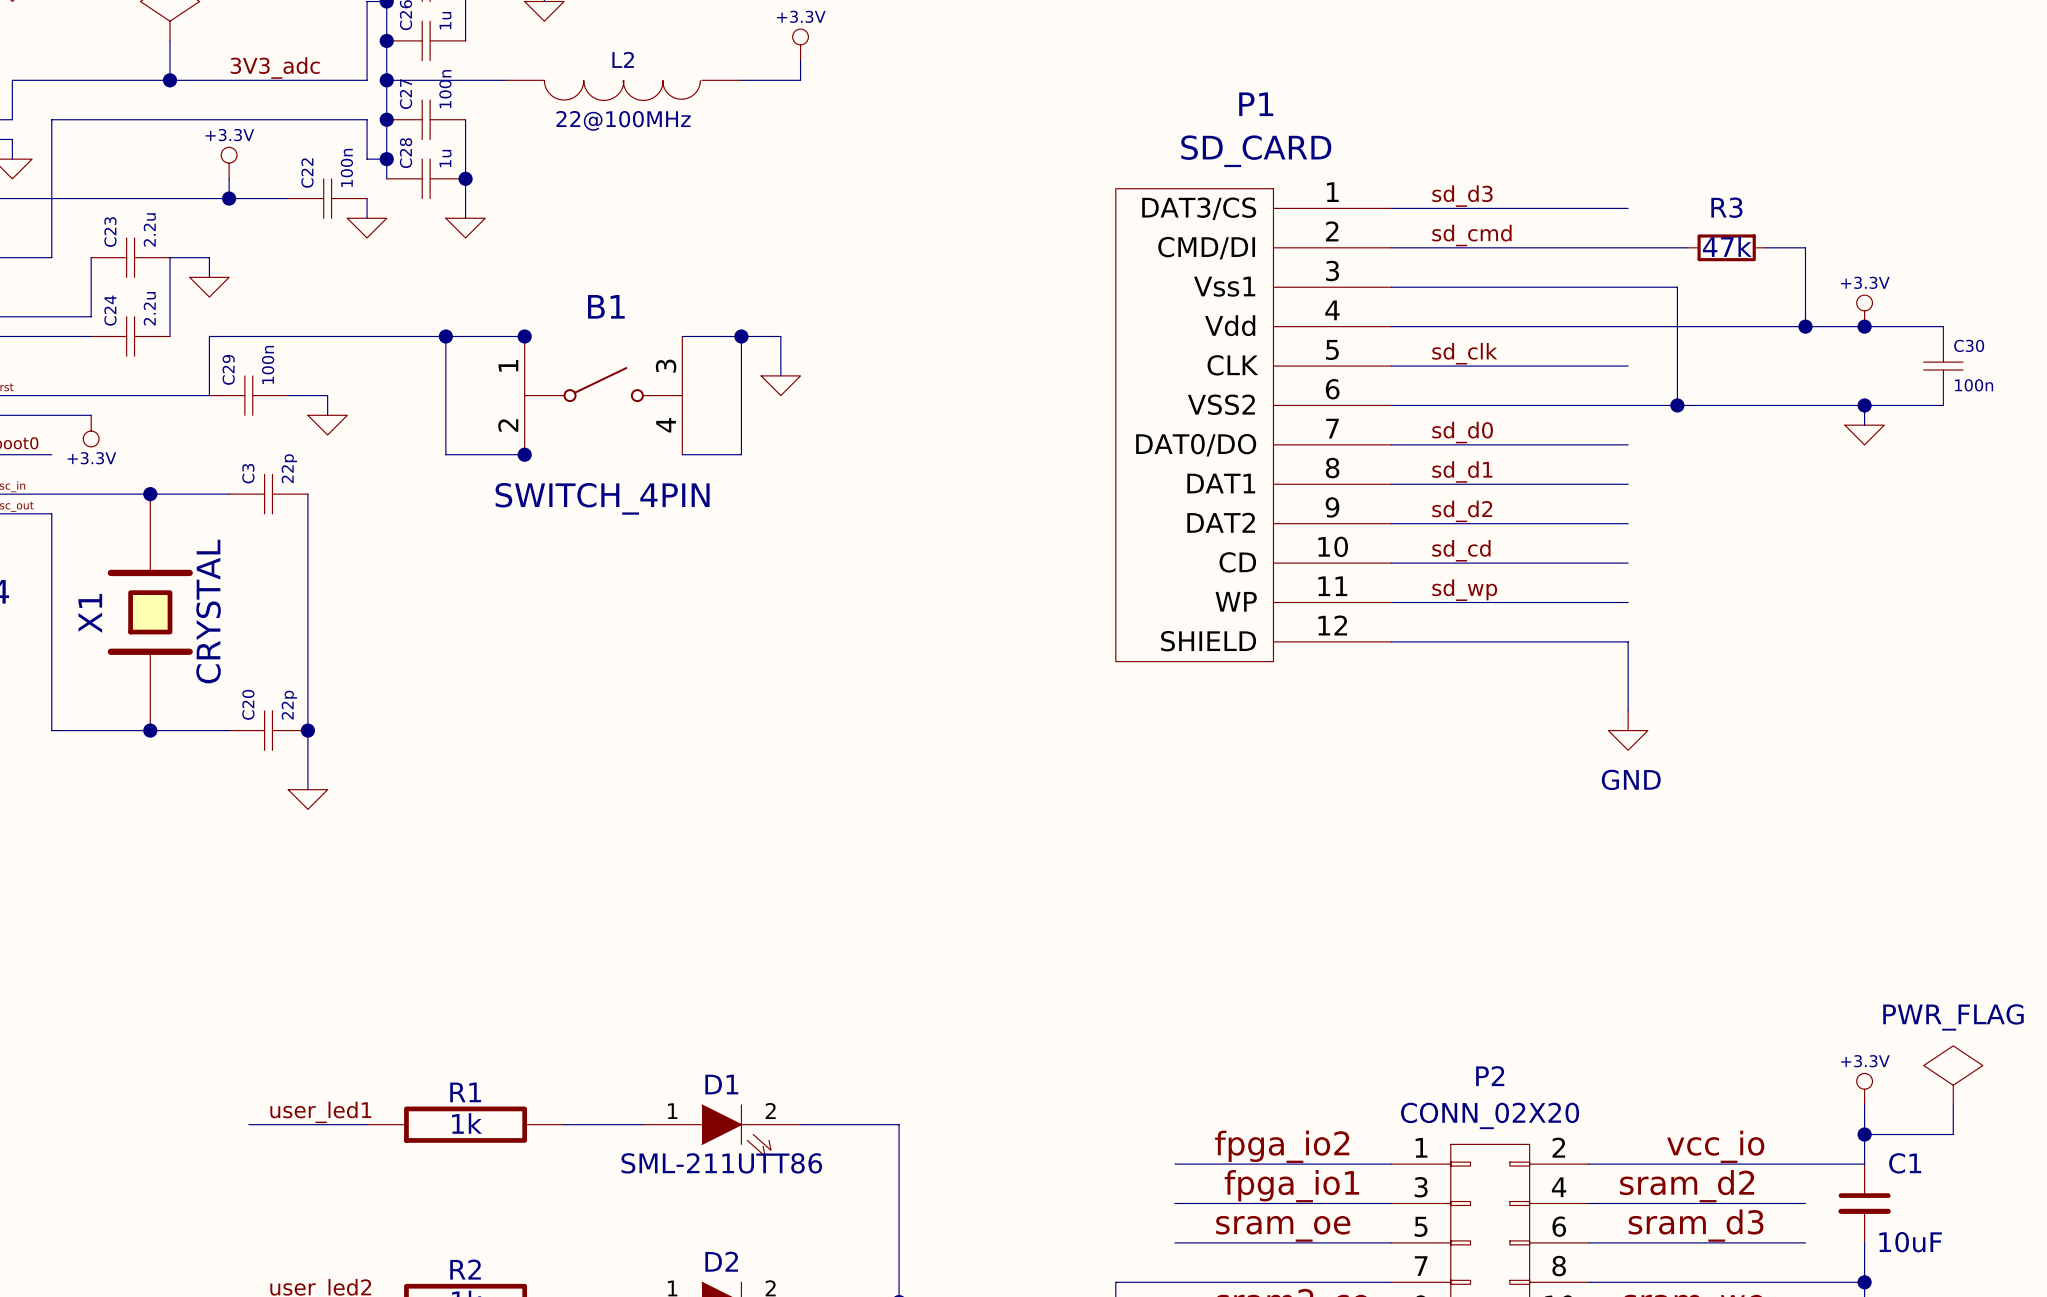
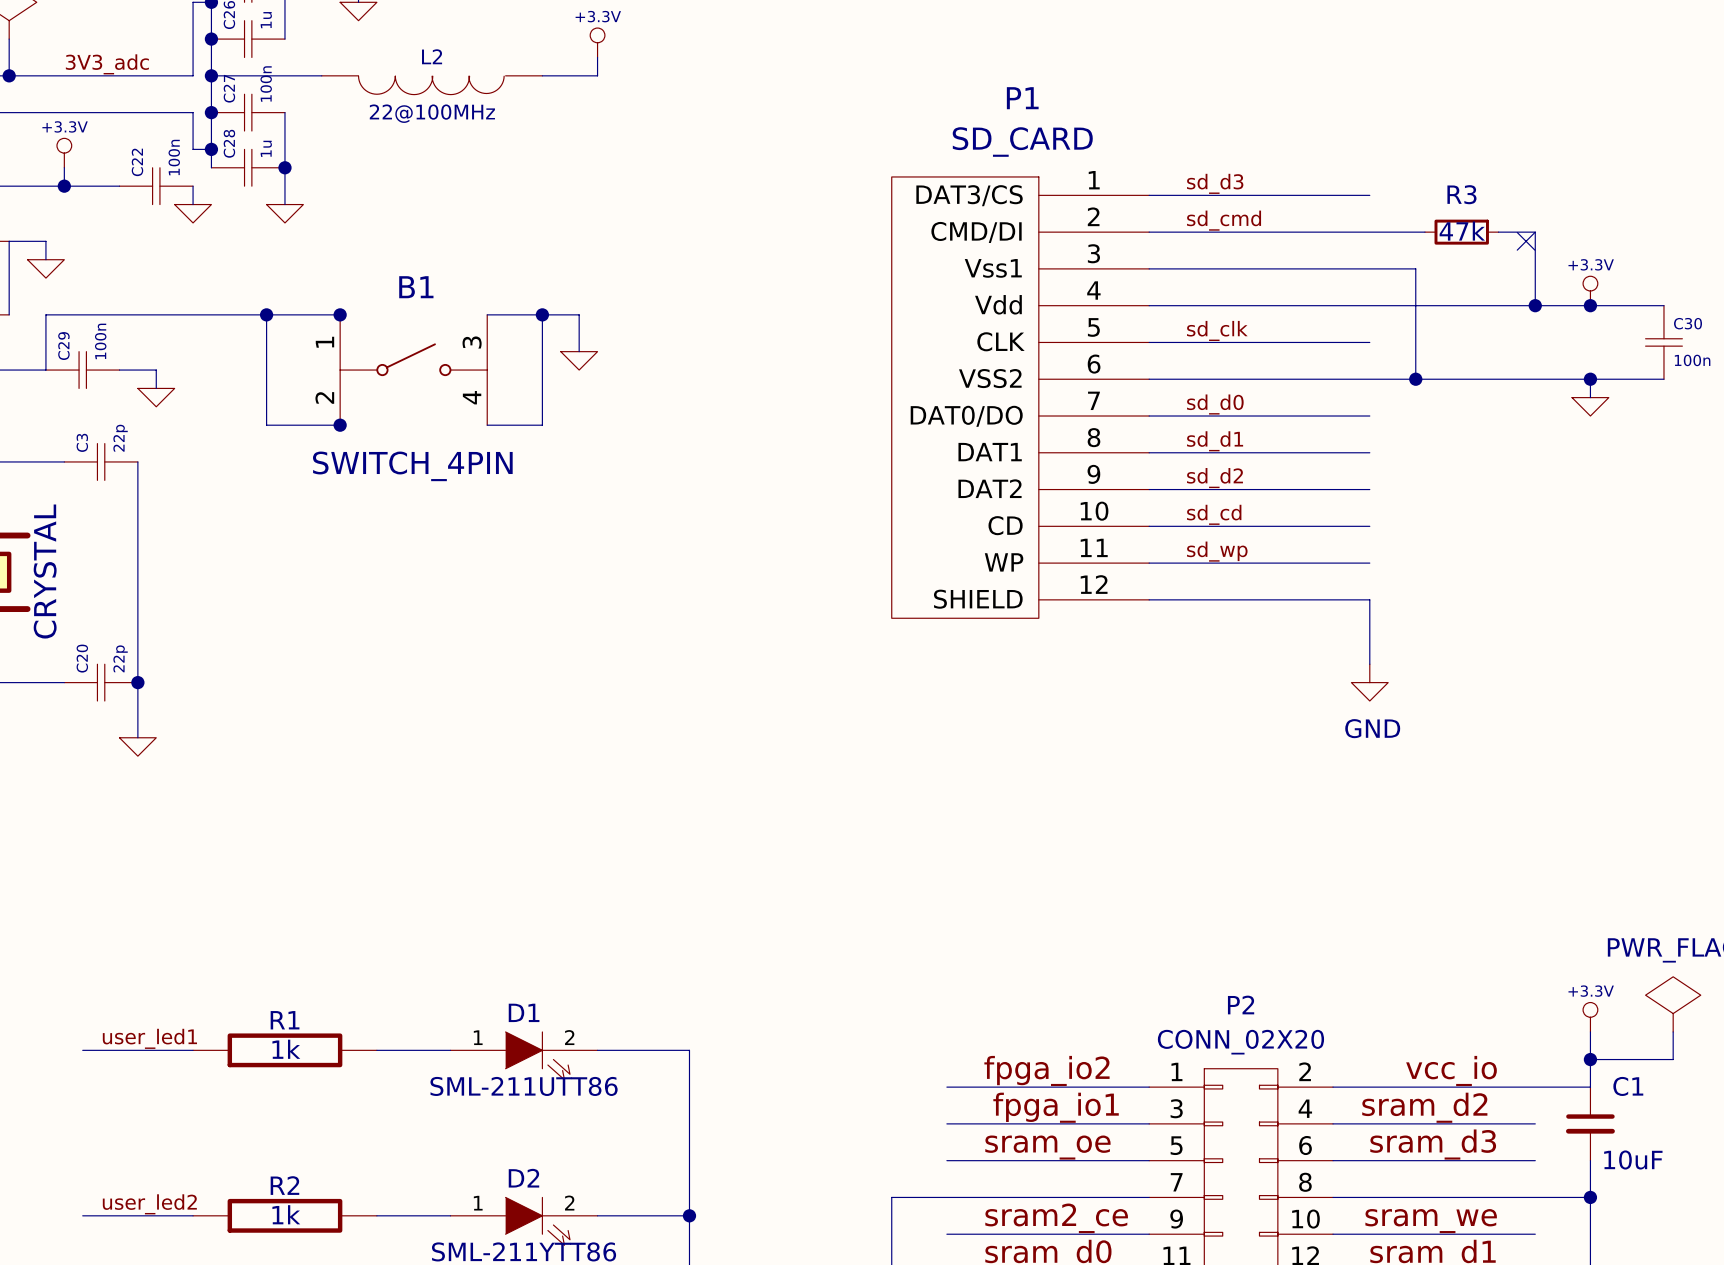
no-connect mark: none -> (1526, 241)

